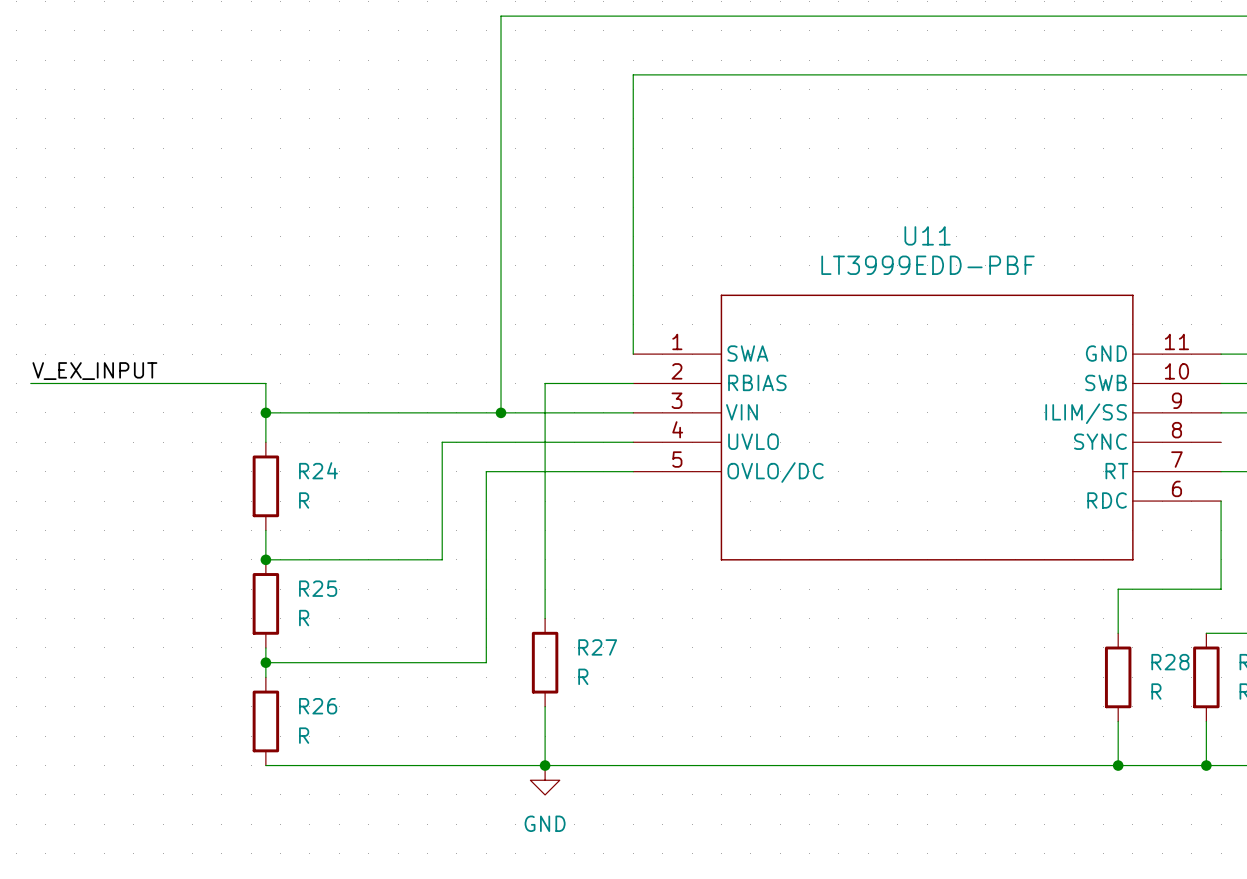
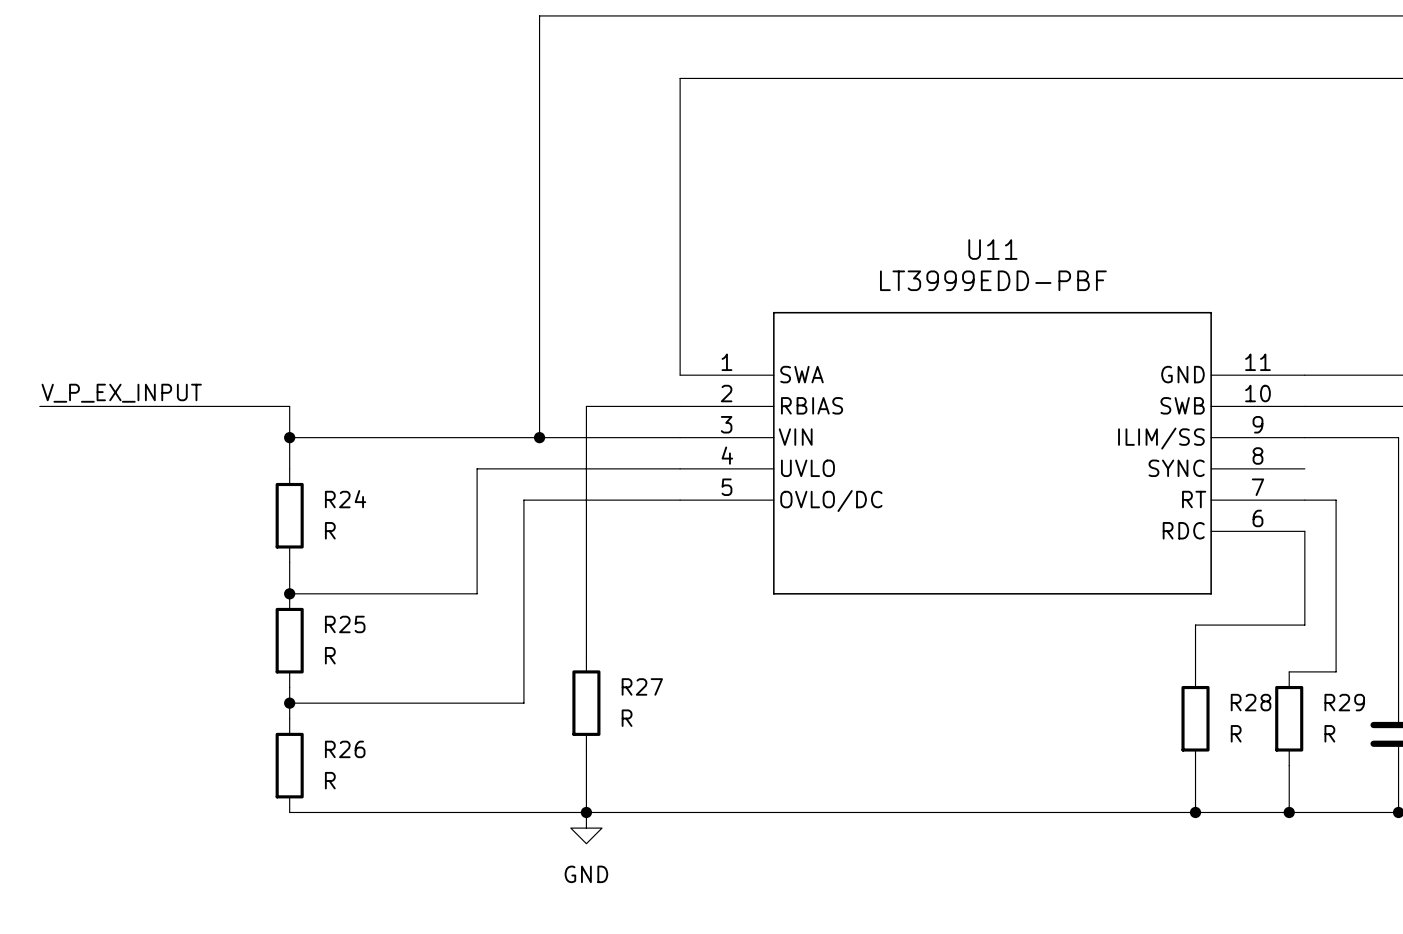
label: V_EX_INPUT (94, 371) -> V_P_EX_INPUT (121, 393)

